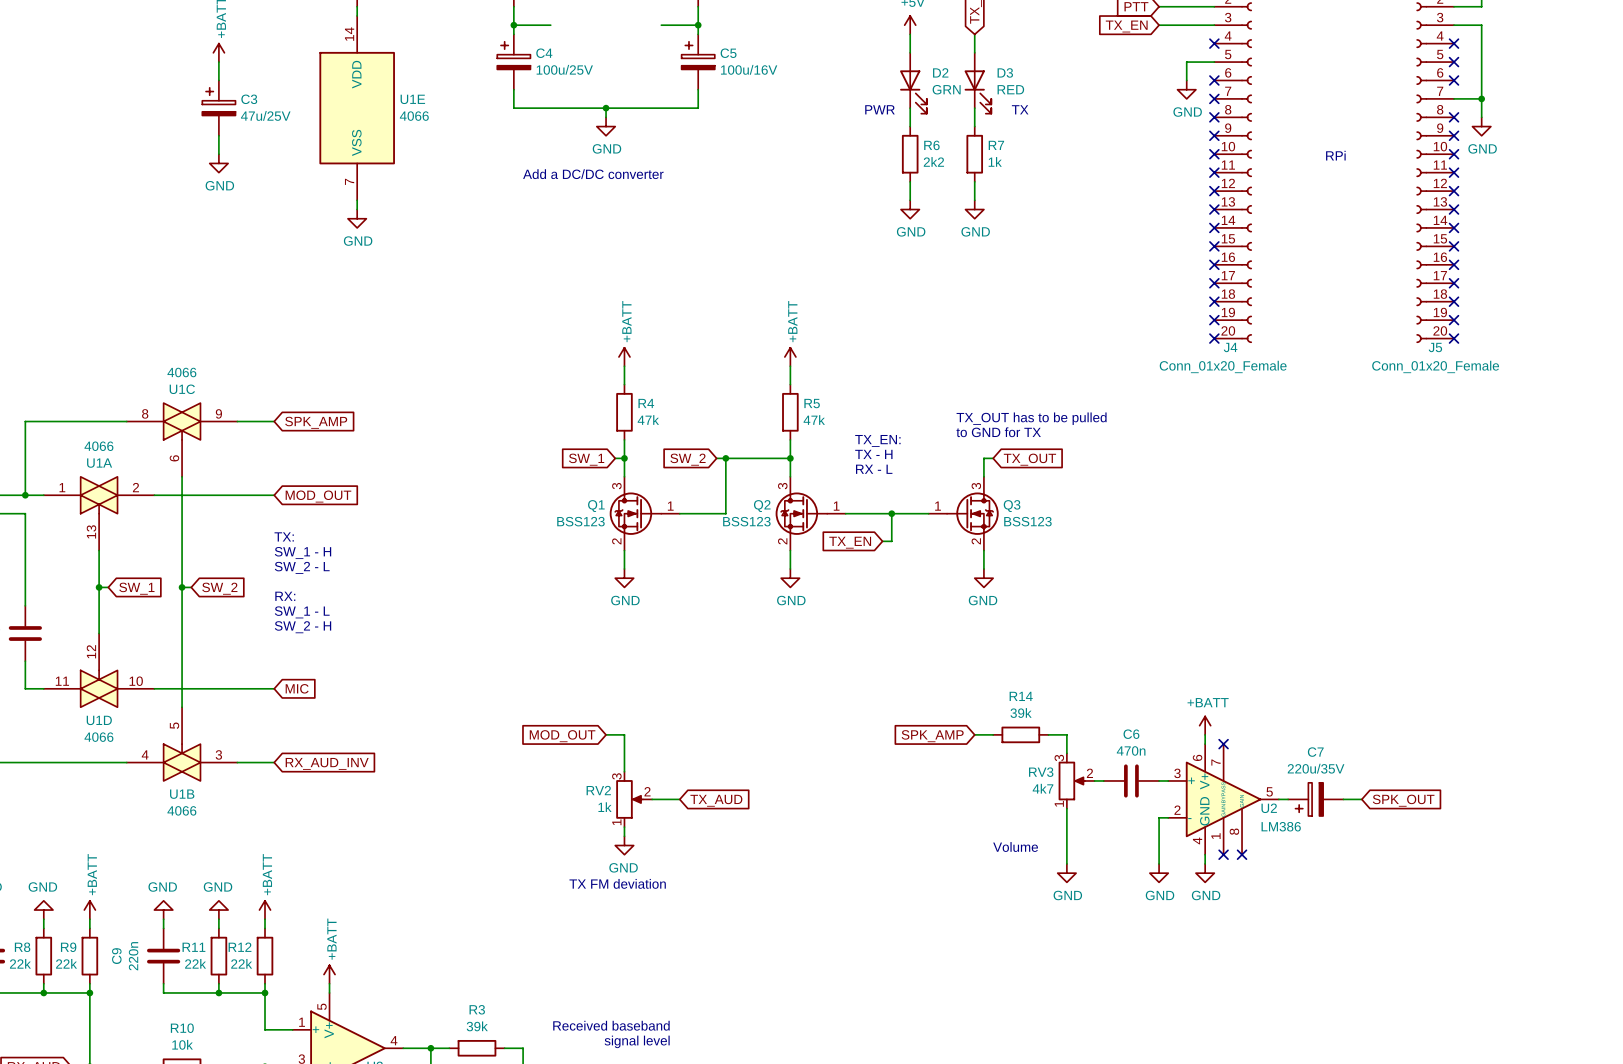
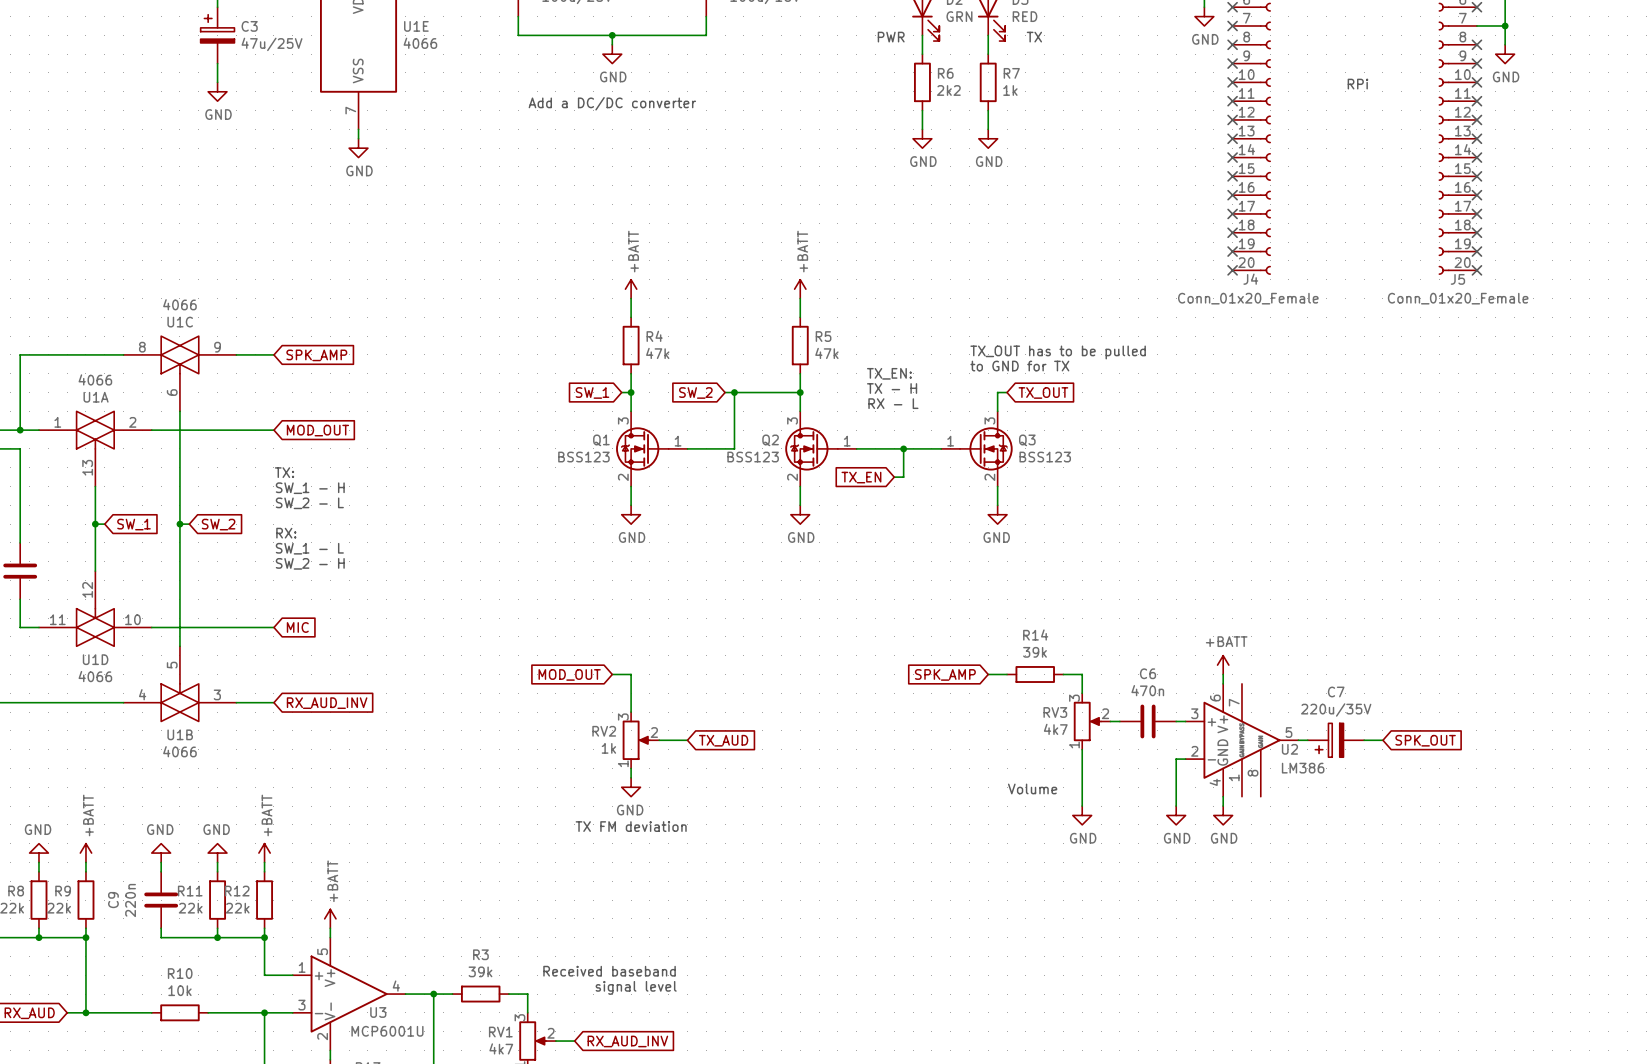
no-connect mark: (1223, 744) -> none
no-connect mark: (1223, 854) -> none
no-connect mark: (1242, 854) -> none

